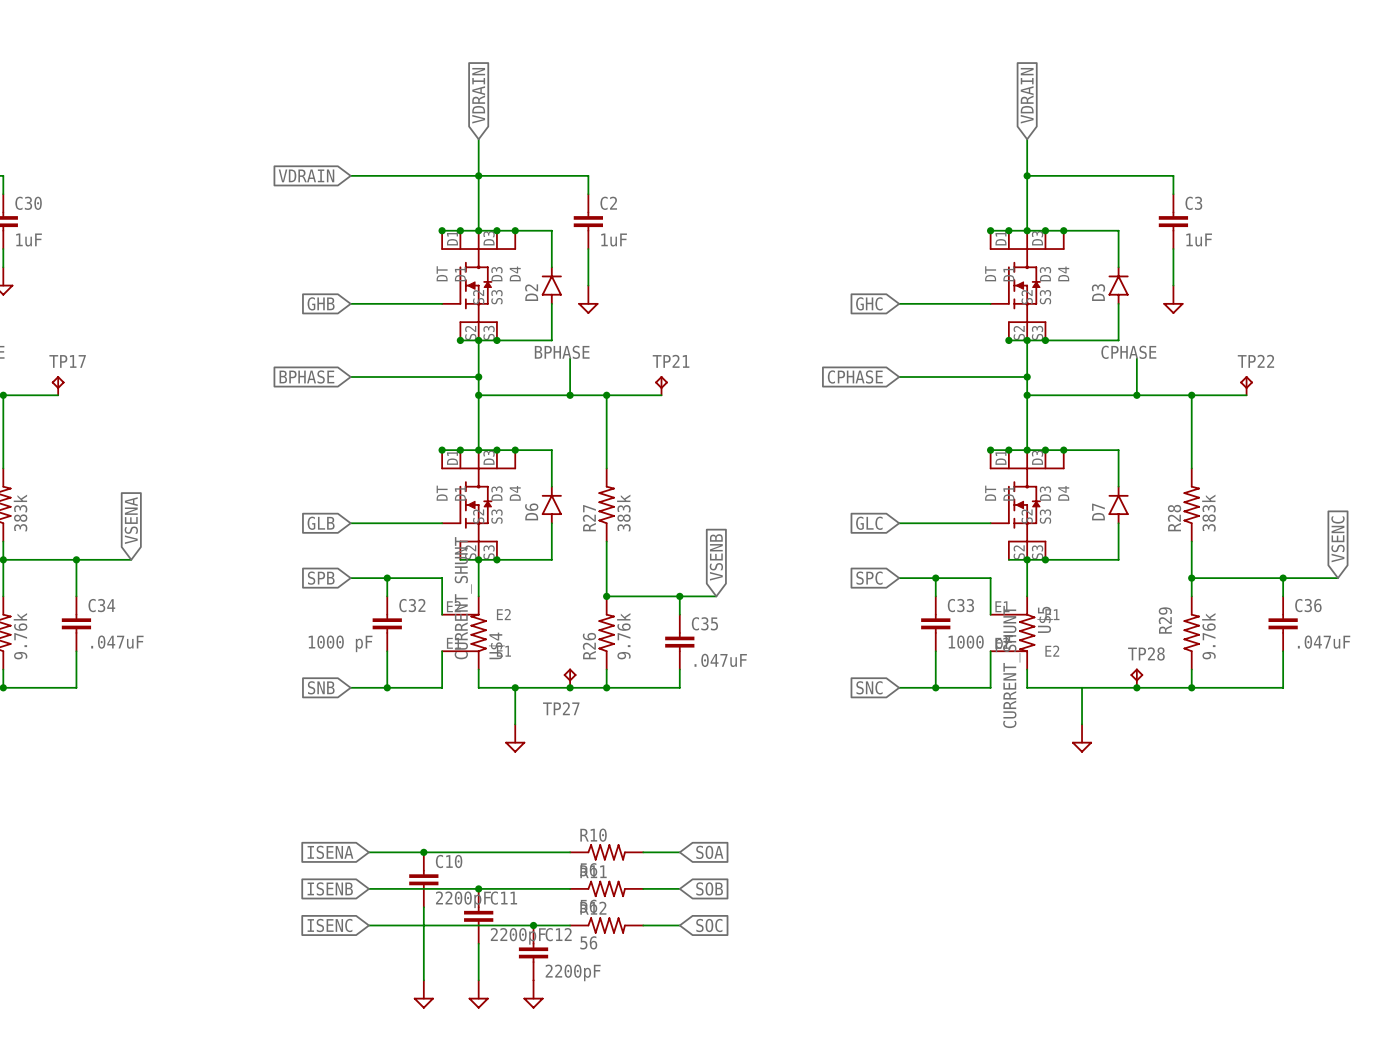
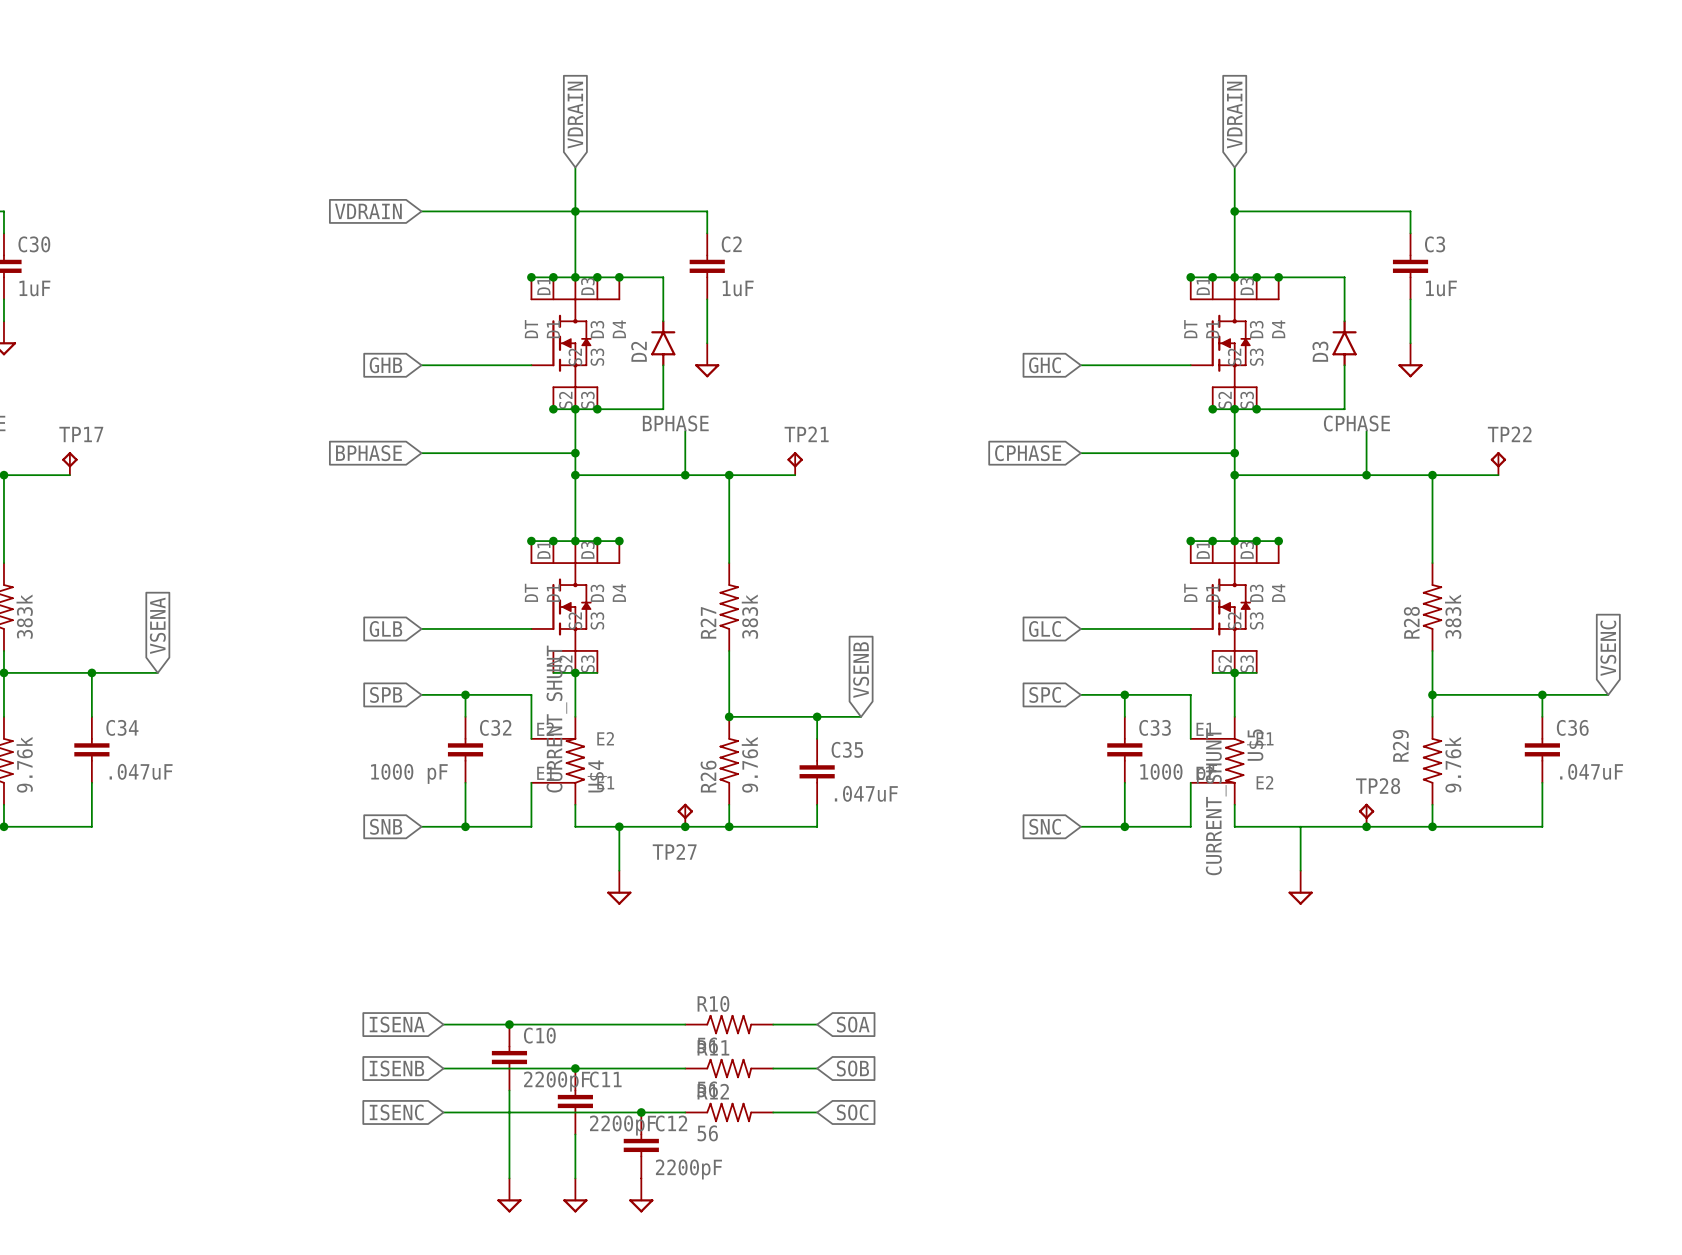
wire: (515, 450) (551, 450) (551, 486) -> none
wire: (1063, 450) (1118, 450) (1118, 486) -> none
D6: (551, 504) -> none
D7: (1118, 504) -> none
wire: (551, 523) (551, 559) (496, 559) -> none
wire: (1118, 523) (1118, 559) (1045, 559) -> none
junction: (496, 559) -> none
junction: (1045, 559) -> none

